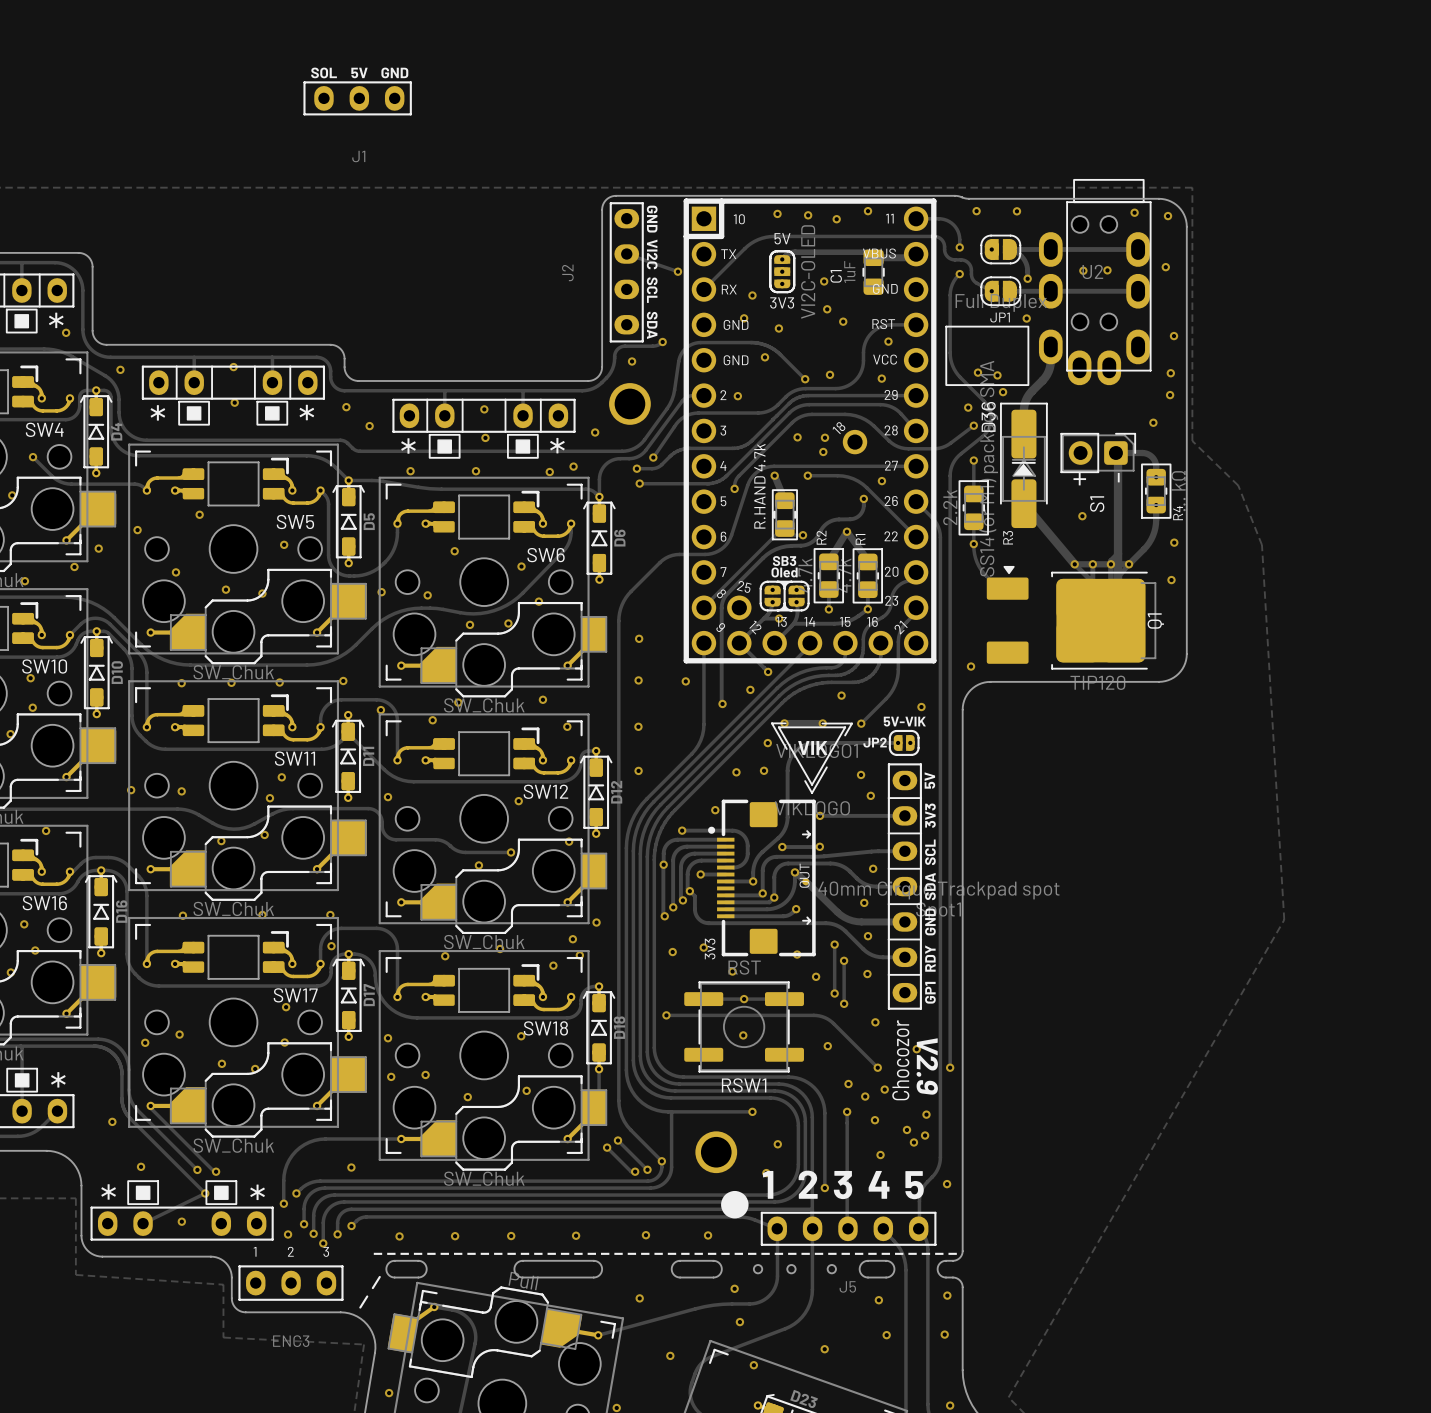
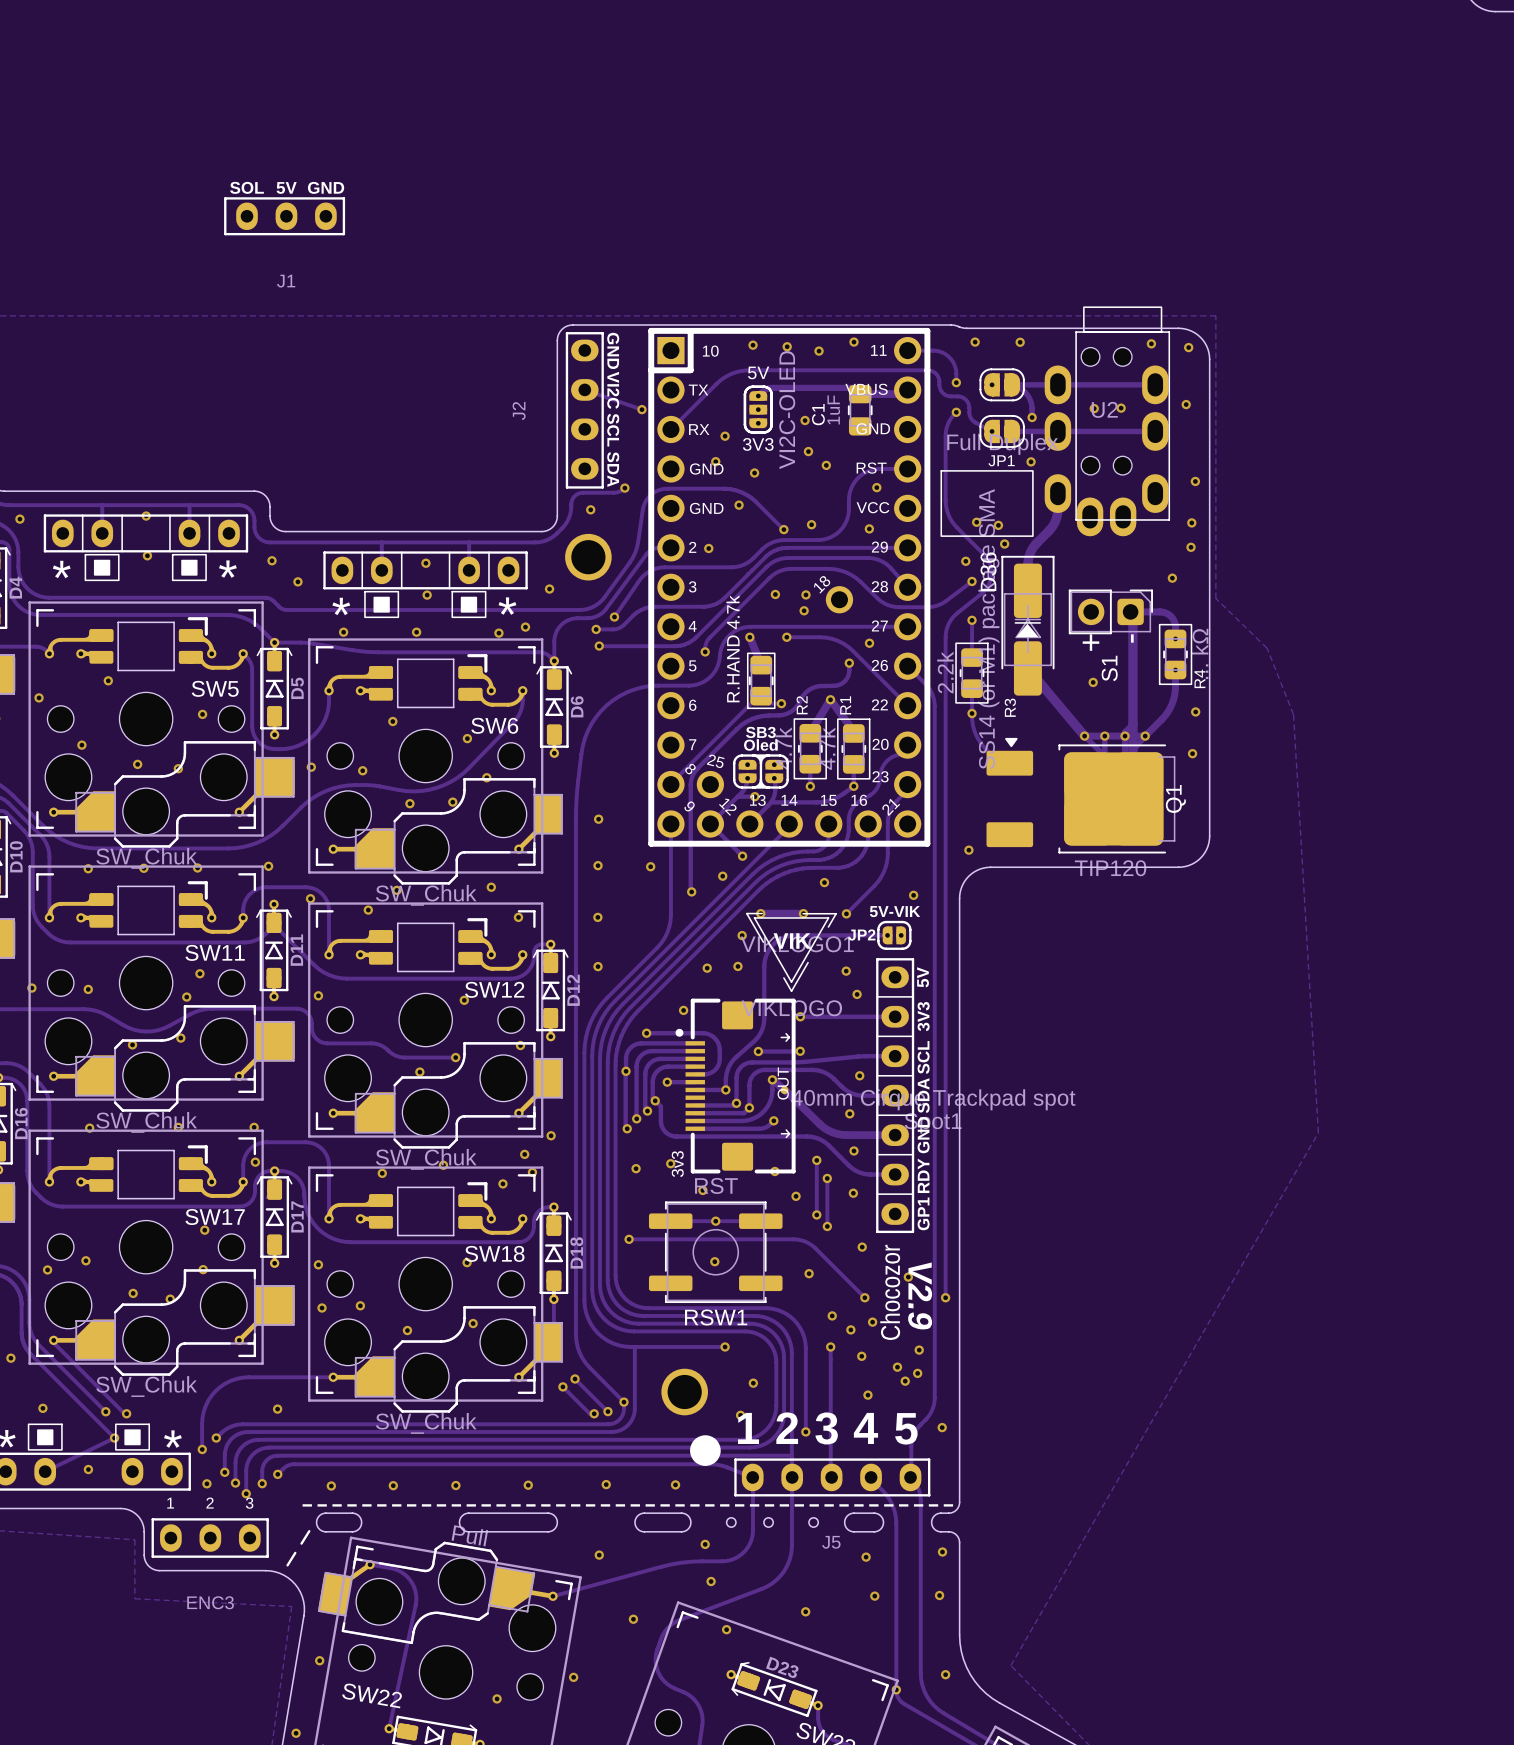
track: (775, 466) (760, 469) (750, 479) (731, 535) (724, 546) (708, 554) (668, 556) (659, 562) (631, 591) (620, 608) (618, 637) -> (750, 626) (736, 630) (727, 637) (721, 647) (716, 668) (703, 681) (692, 685) (650, 686) (634, 689) (613, 700) (601, 710) (591, 723) (582, 746) (575, 817)

